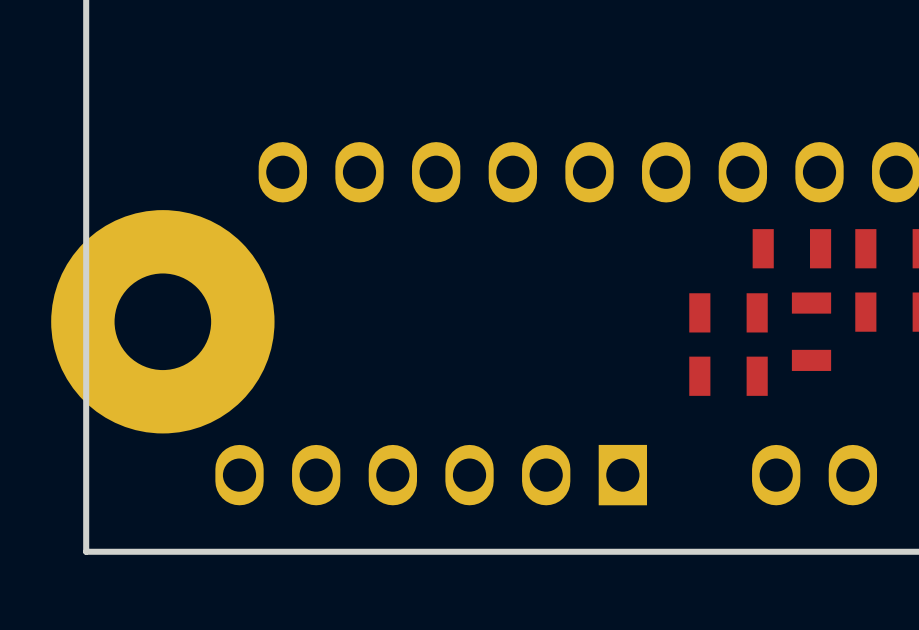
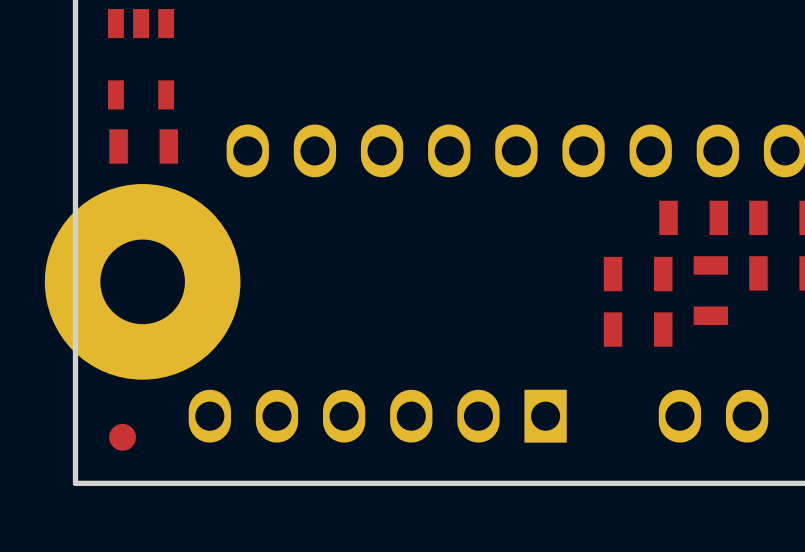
part: none -> (141, 59)
part: none -> (143, 146)
part: none -> (122, 437)

